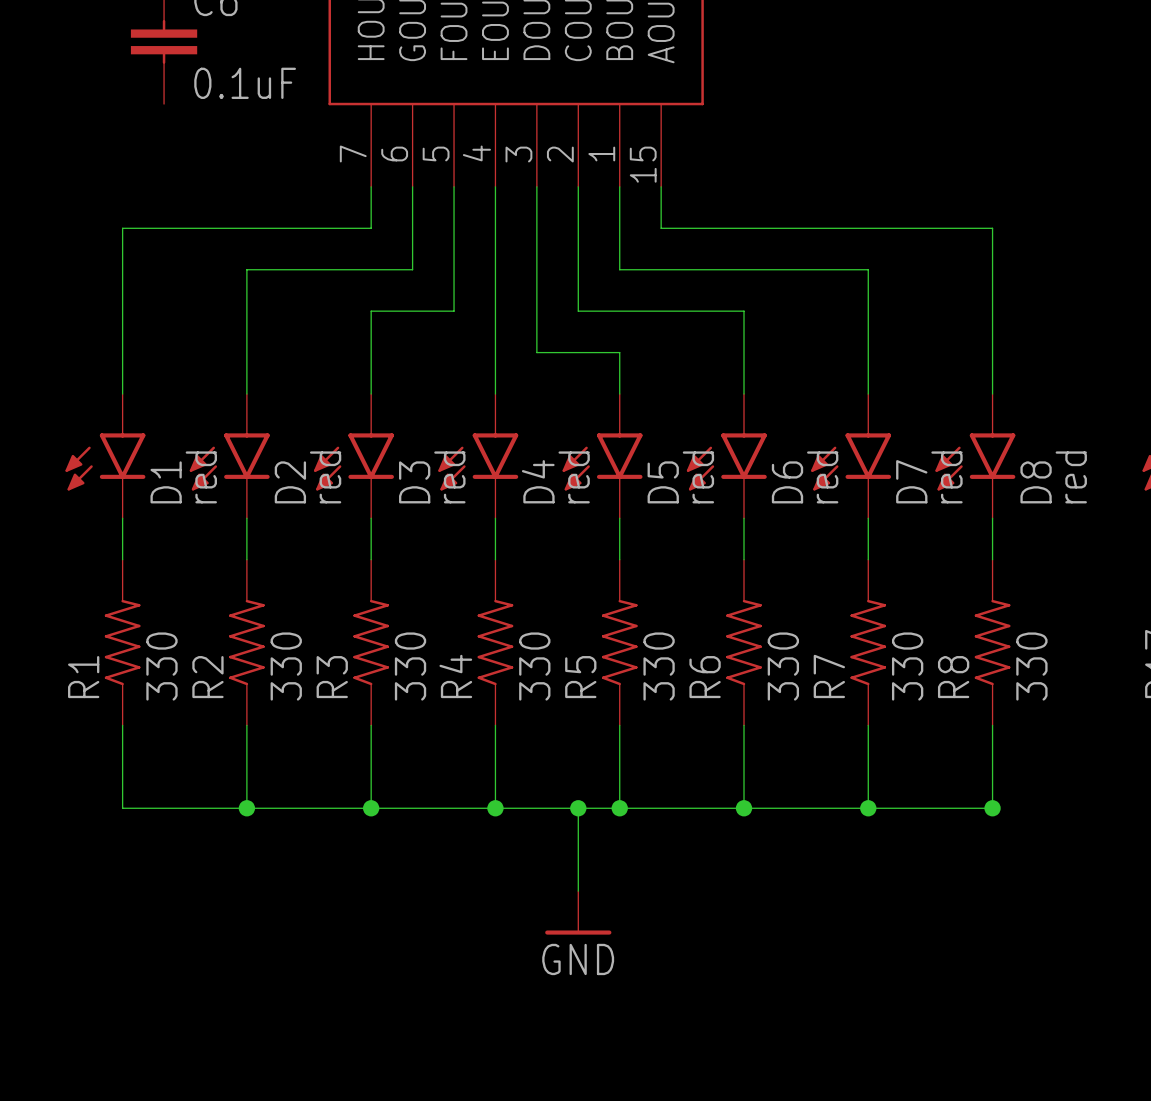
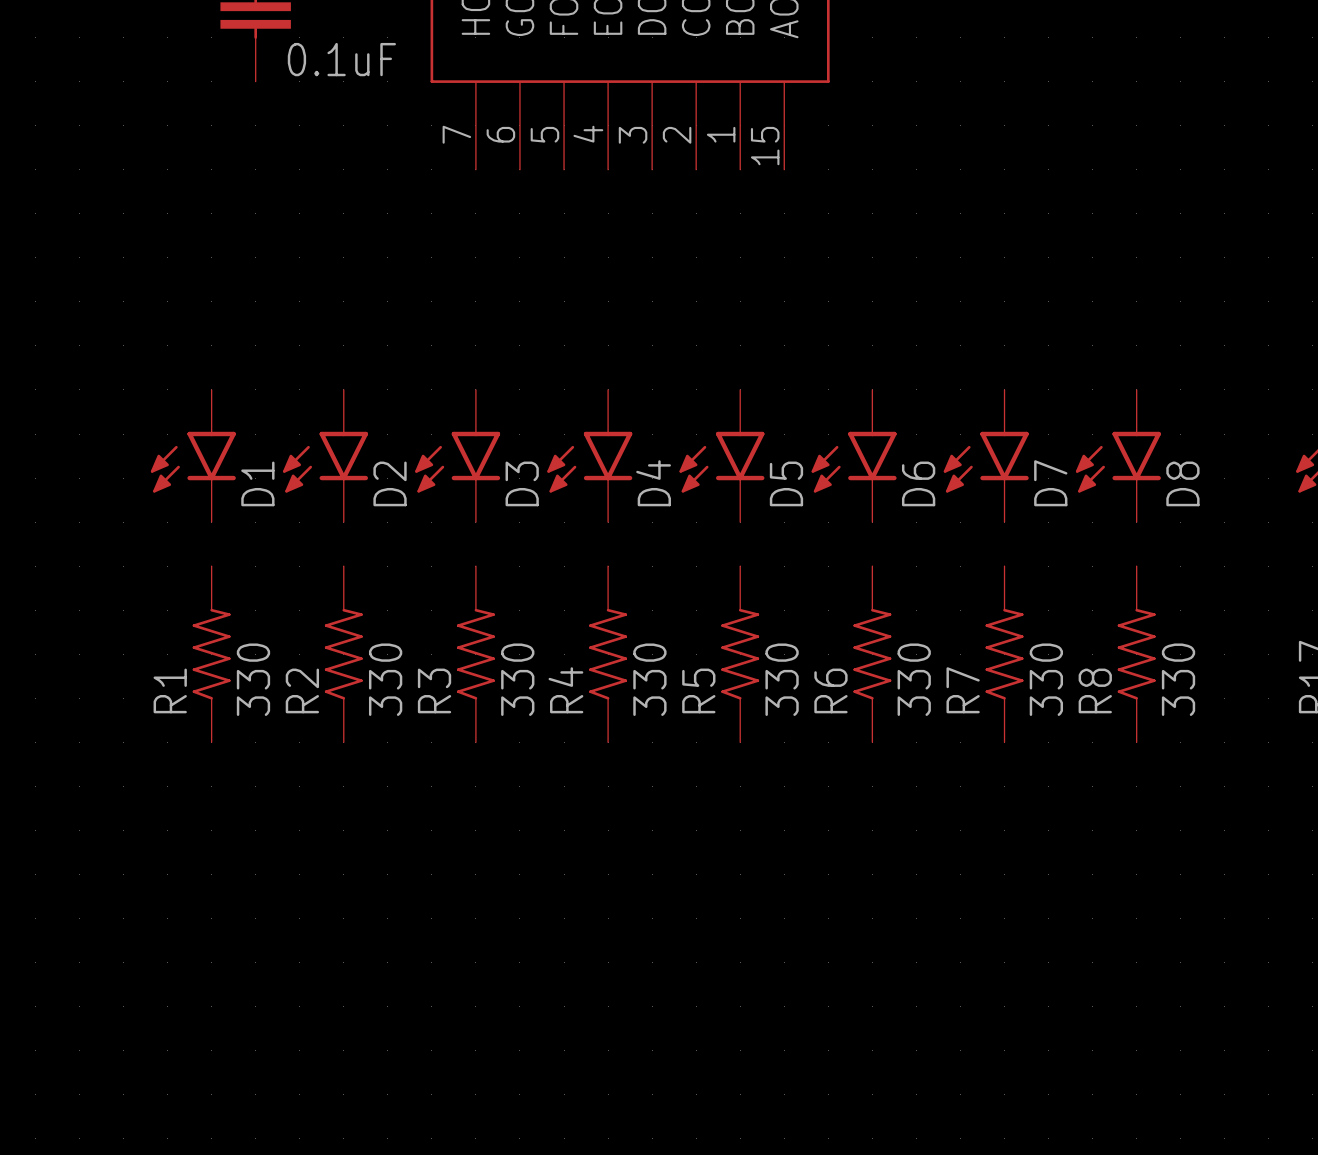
wire: (371, 186) (371, 228) (122, 228) (122, 394) -> none
wire: (412, 186) (412, 269) (246, 269) (246, 394) -> none
wire: (454, 186) (454, 311) (371, 311) (371, 394) -> none
wire: (495, 186) (495, 394) -> none
wire: (536, 186) (536, 352) (619, 352) (619, 394) -> none
wire: (578, 186) (578, 311) (744, 311) (744, 394) -> none
wire: (619, 186) (619, 269) (868, 269) (868, 394) -> none
wire: (661, 186) (661, 228) (992, 228) (992, 394) -> none
D1 value: red (201, 477) -> none
D2 value: red (325, 477) -> none
D3 value: red (449, 477) -> none
D4 value: red (574, 477) -> none
D5 value: red (698, 477) -> none
D6 value: red (822, 477) -> none
D7 value: red (946, 477) -> none
D8 value: red (1071, 477) -> none
wire: (122, 518) (122, 559) -> none
wire: (246, 518) (246, 559) -> none
wire: (371, 518) (371, 559) -> none
wire: (495, 518) (495, 559) -> none
wire: (619, 518) (619, 559) -> none
wire: (744, 518) (744, 559) -> none
wire: (868, 518) (868, 559) -> none
wire: (992, 518) (992, 559) -> none
wire: (122, 725) (122, 808) (992, 808) (992, 725) -> none
wire: (246, 725) (246, 808) -> none
wire: (371, 725) (371, 808) -> none
wire: (495, 725) (495, 808) -> none
wire: (619, 725) (619, 808) -> none
wire: (744, 725) (744, 808) -> none
wire: (868, 725) (868, 808) -> none
junction: (246, 808) -> none
junction: (371, 808) -> none
junction: (495, 808) -> none
wire: (578, 808) (578, 891) -> none
junction: (578, 808) -> none
junction: (619, 808) -> none
junction: (744, 808) -> none
junction: (868, 808) -> none
junction: (992, 808) -> none
power symbol: GND (578, 912) -> none

